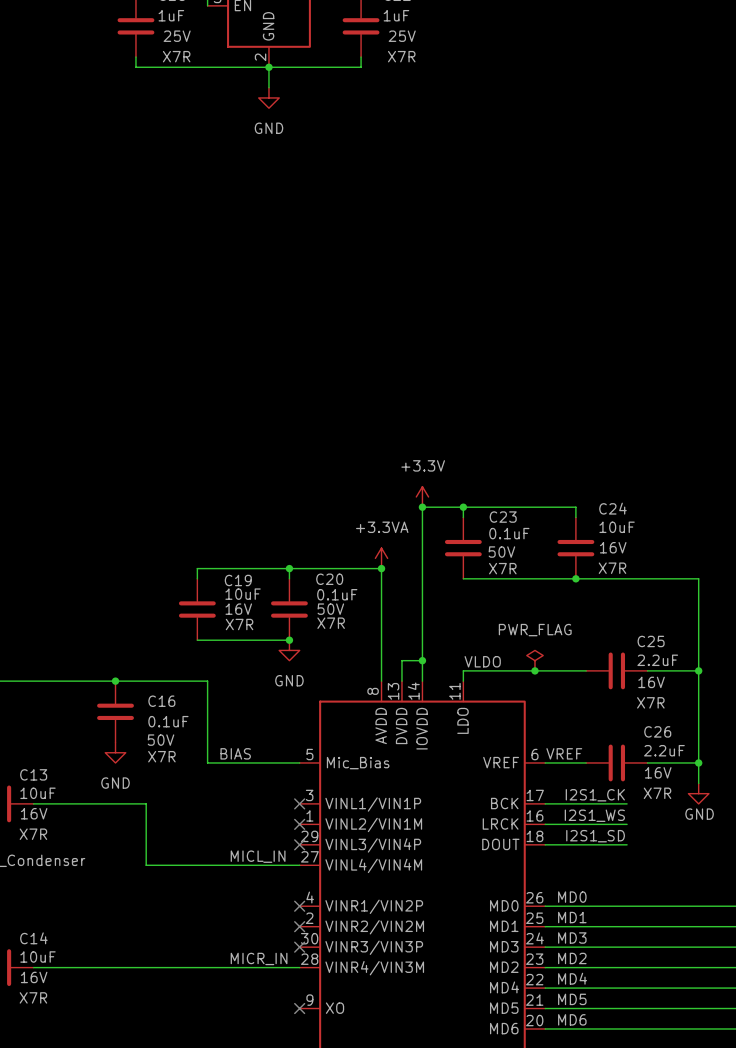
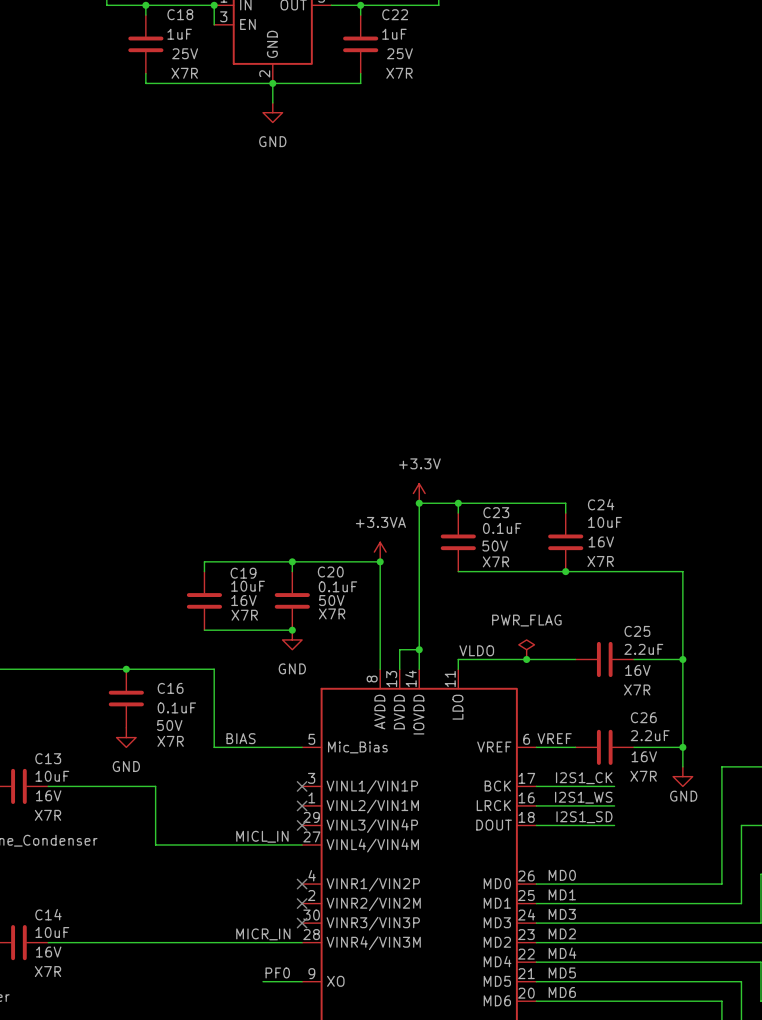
label: none -> PF0 (277, 972)
wire: none -> (263, 981) (302, 981)
no-connect mark: (299, 1008) -> none

